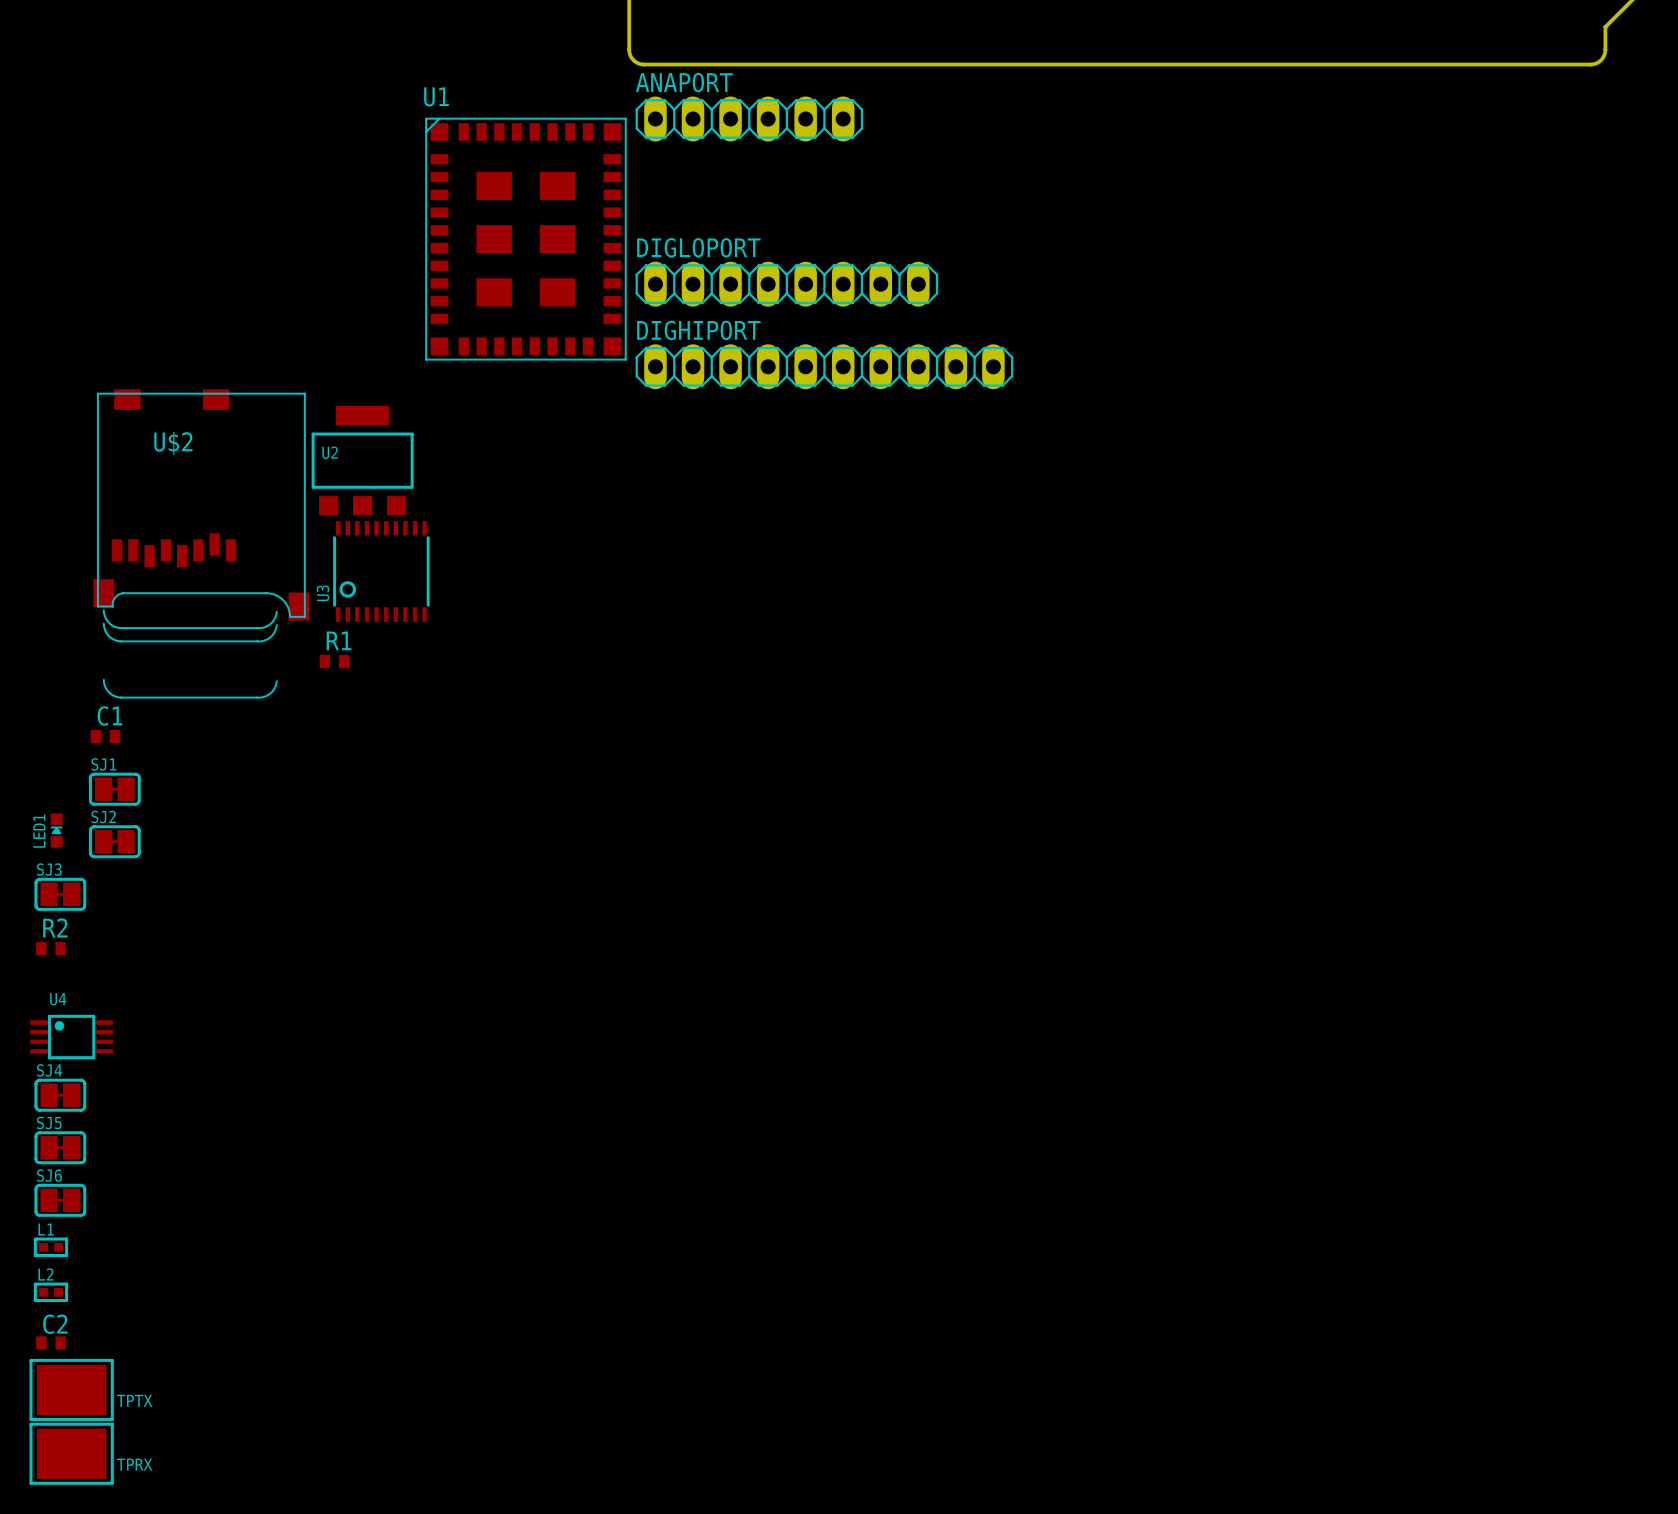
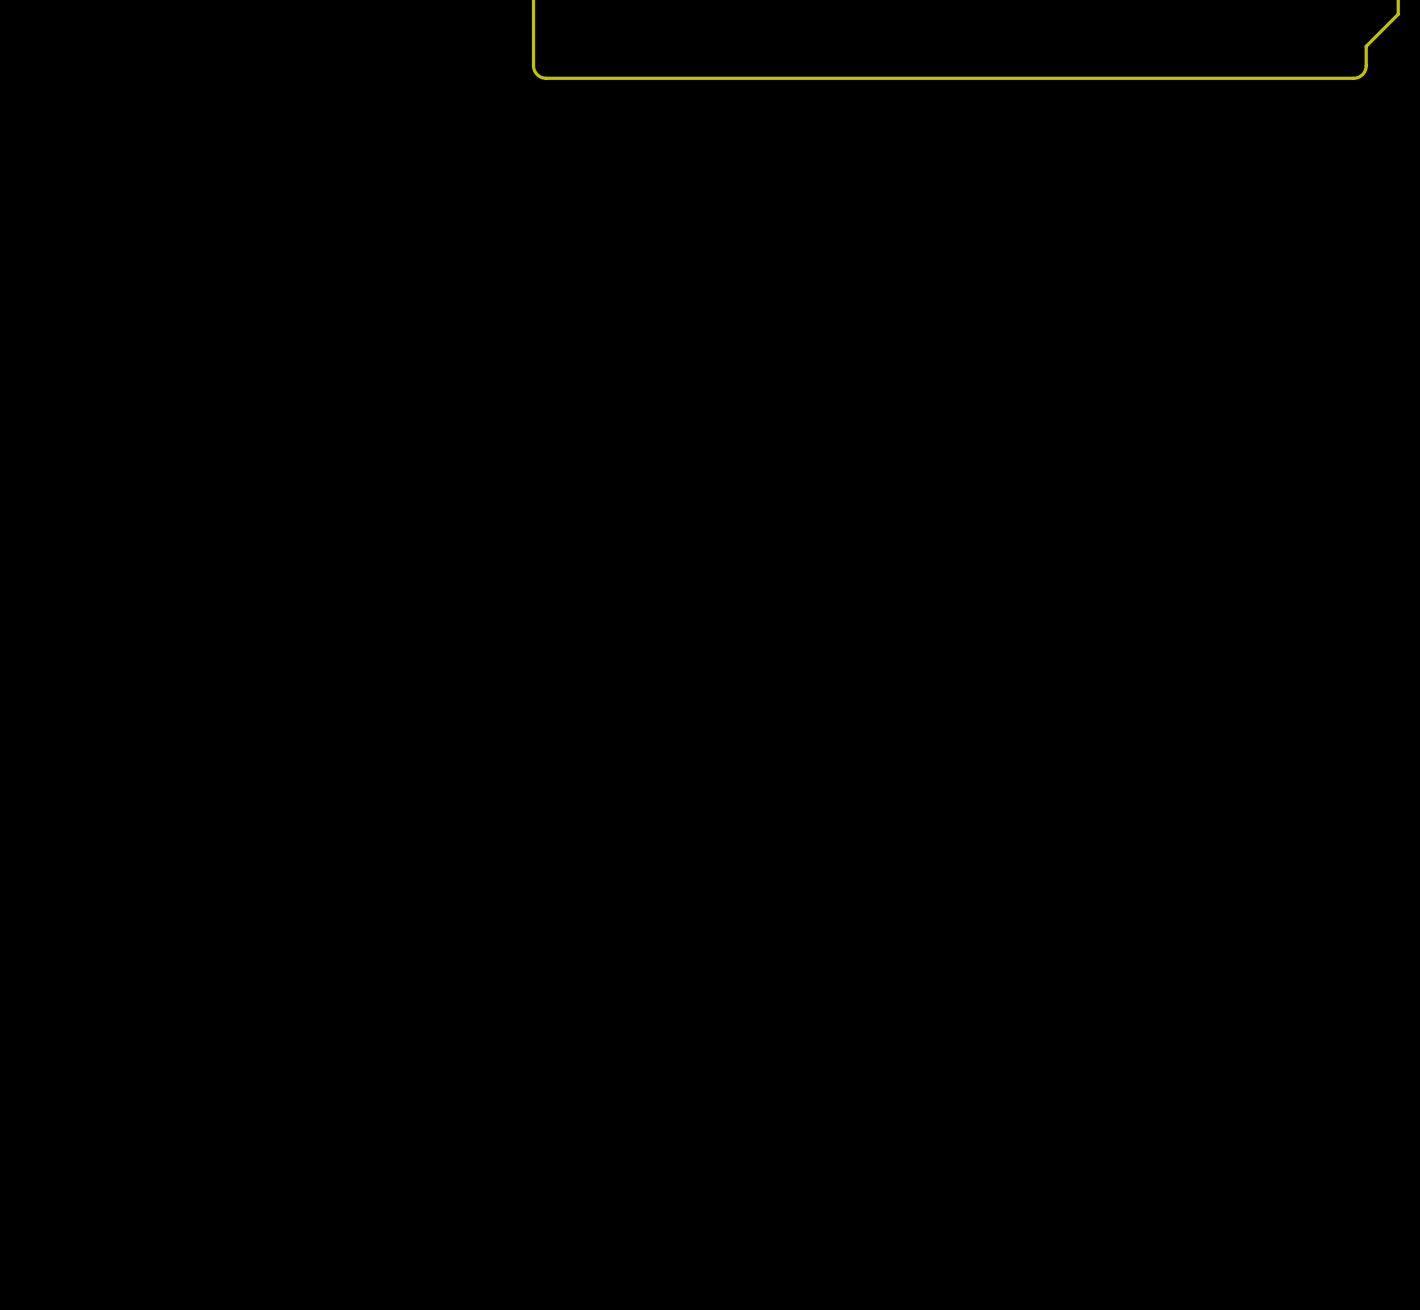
ANAPORT: (749, 118) -> none
U1: (525, 239) -> none
DIGLOPORT: (786, 284) -> none
DIGHIPORT: (824, 366) -> none
U2: (362, 460) -> none
U$2: (201, 543) -> none
U3: (381, 571) -> none
R1: (334, 661) -> none
C1: (105, 736) -> none
SJ1: (114, 789) -> none
LED1: (56, 830) -> none
SJ2: (114, 841) -> none
SJ3: (60, 894) -> none
R2: (50, 948) -> none
U4: (71, 1036) -> none
SJ4: (60, 1095) -> none
SJ5: (60, 1147) -> none
SJ6: (60, 1200) -> none
L1: (50, 1247) -> none
L2: (50, 1292) -> none
C2: (50, 1342) -> none
TPTX: (71, 1389) -> none
TPRX: (71, 1453) -> none

